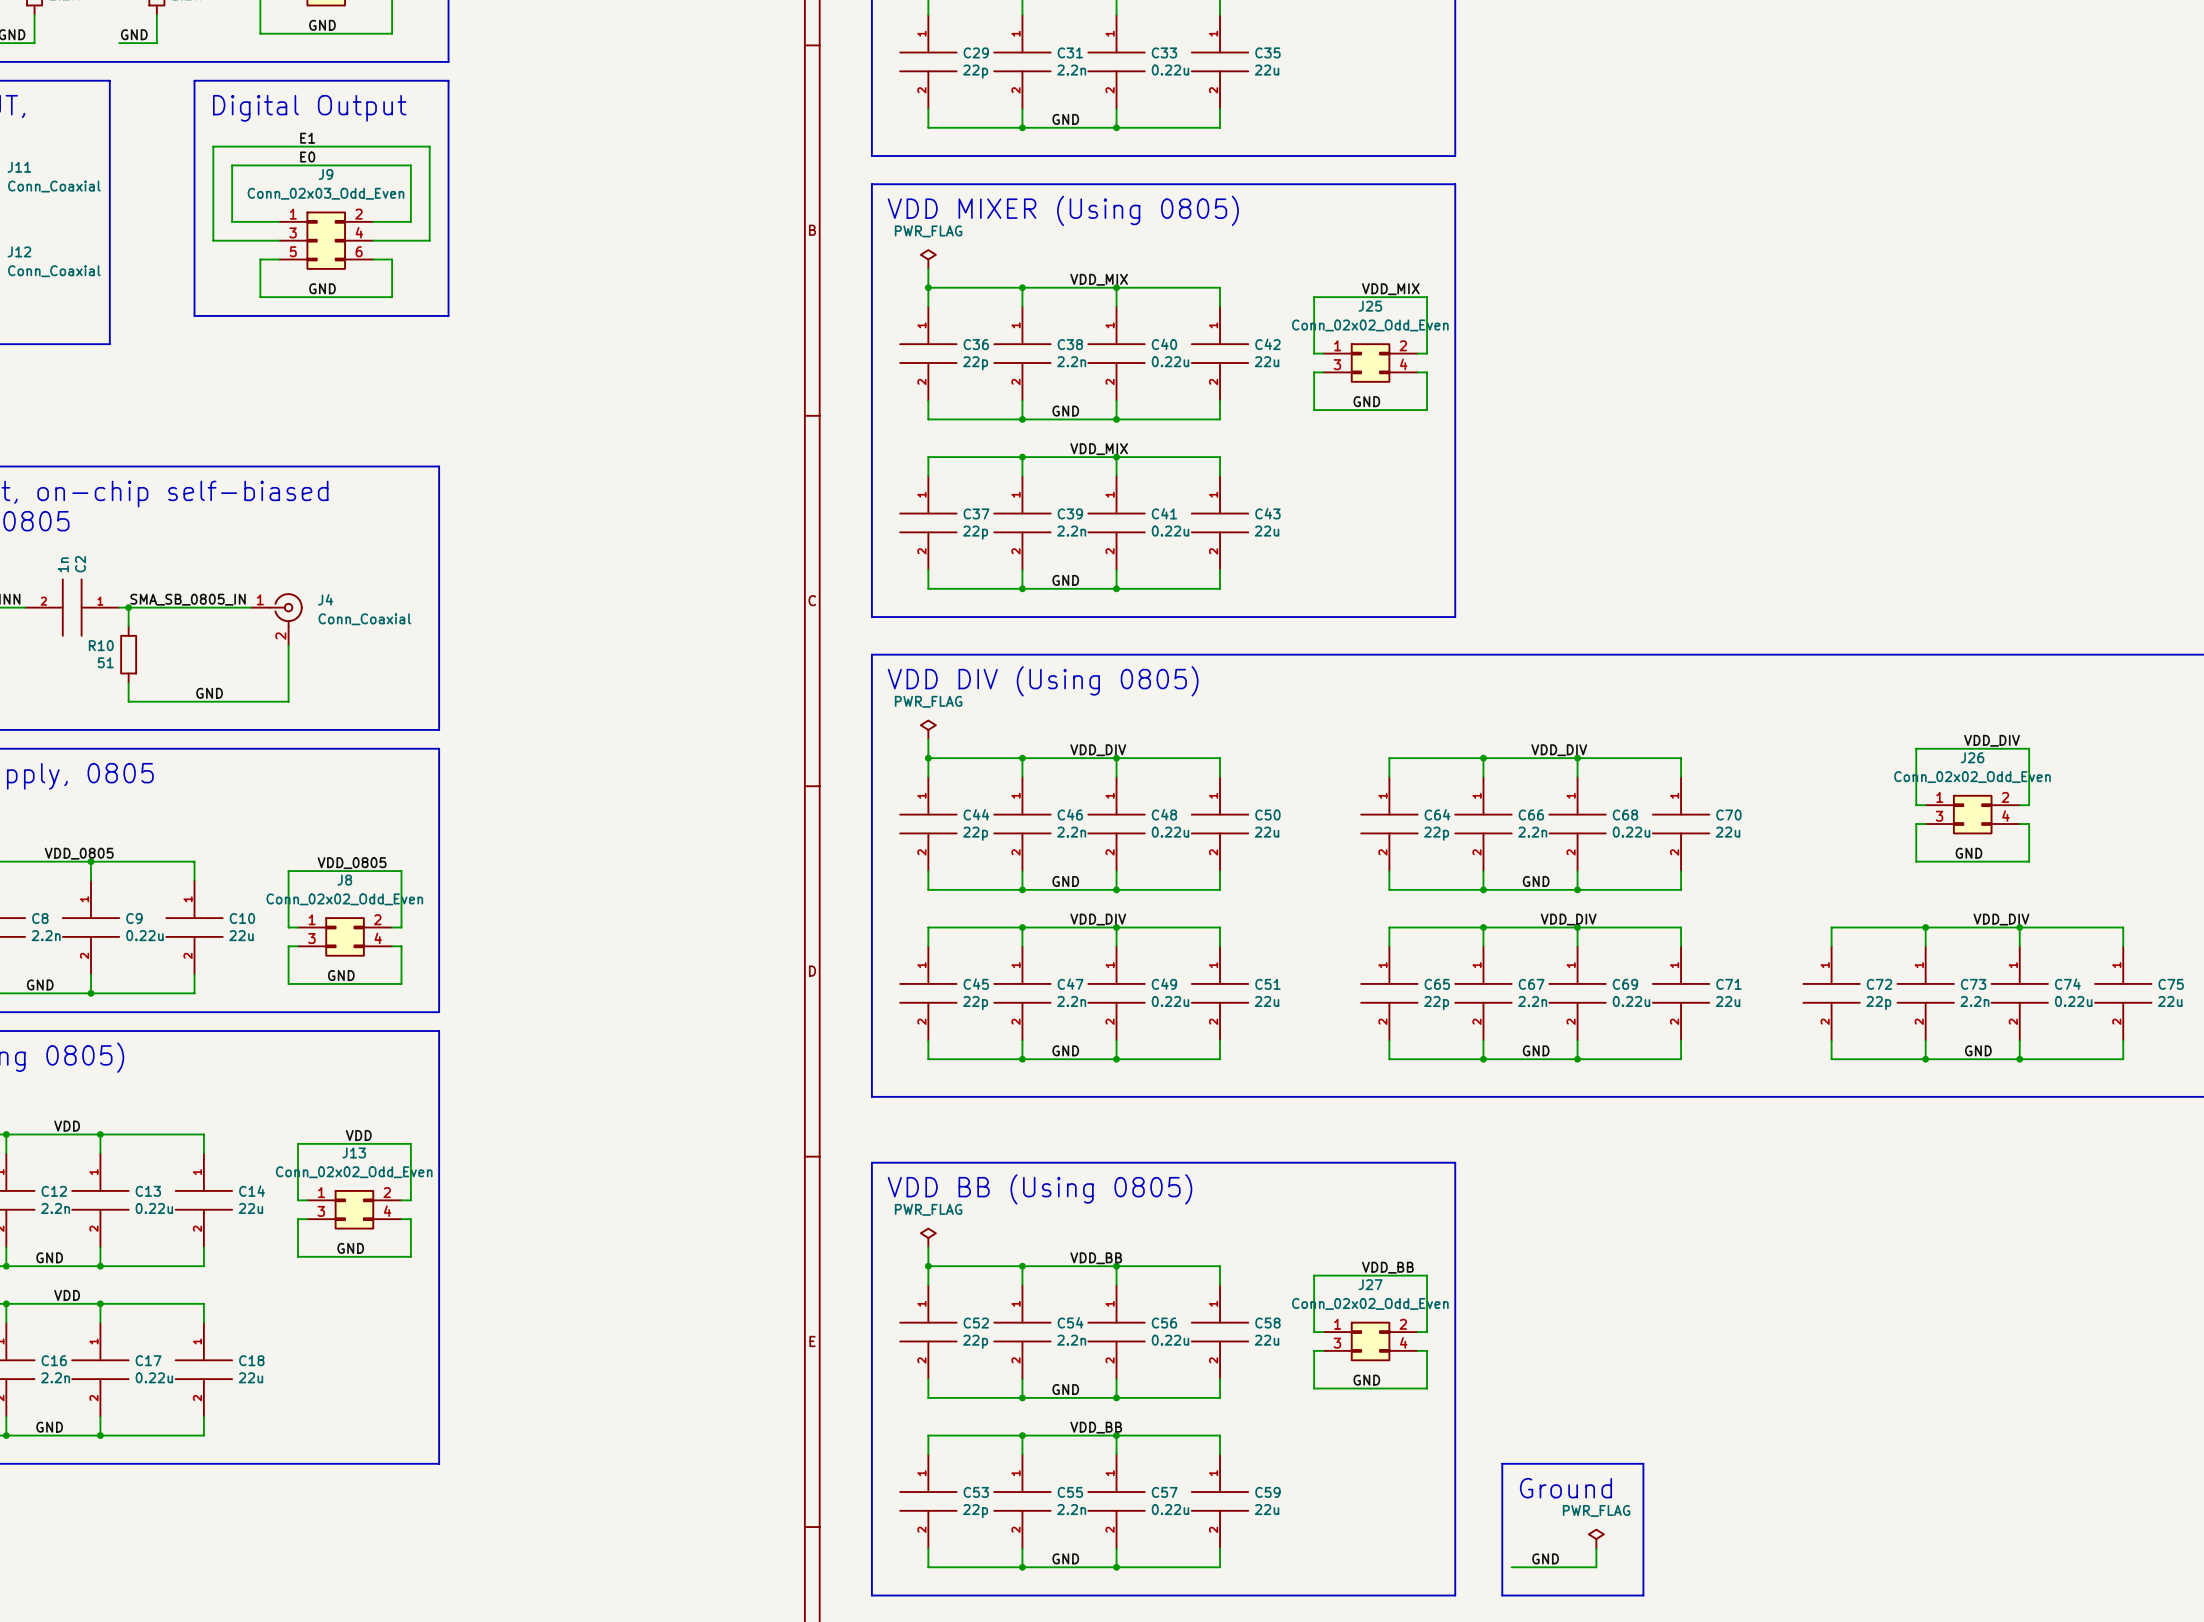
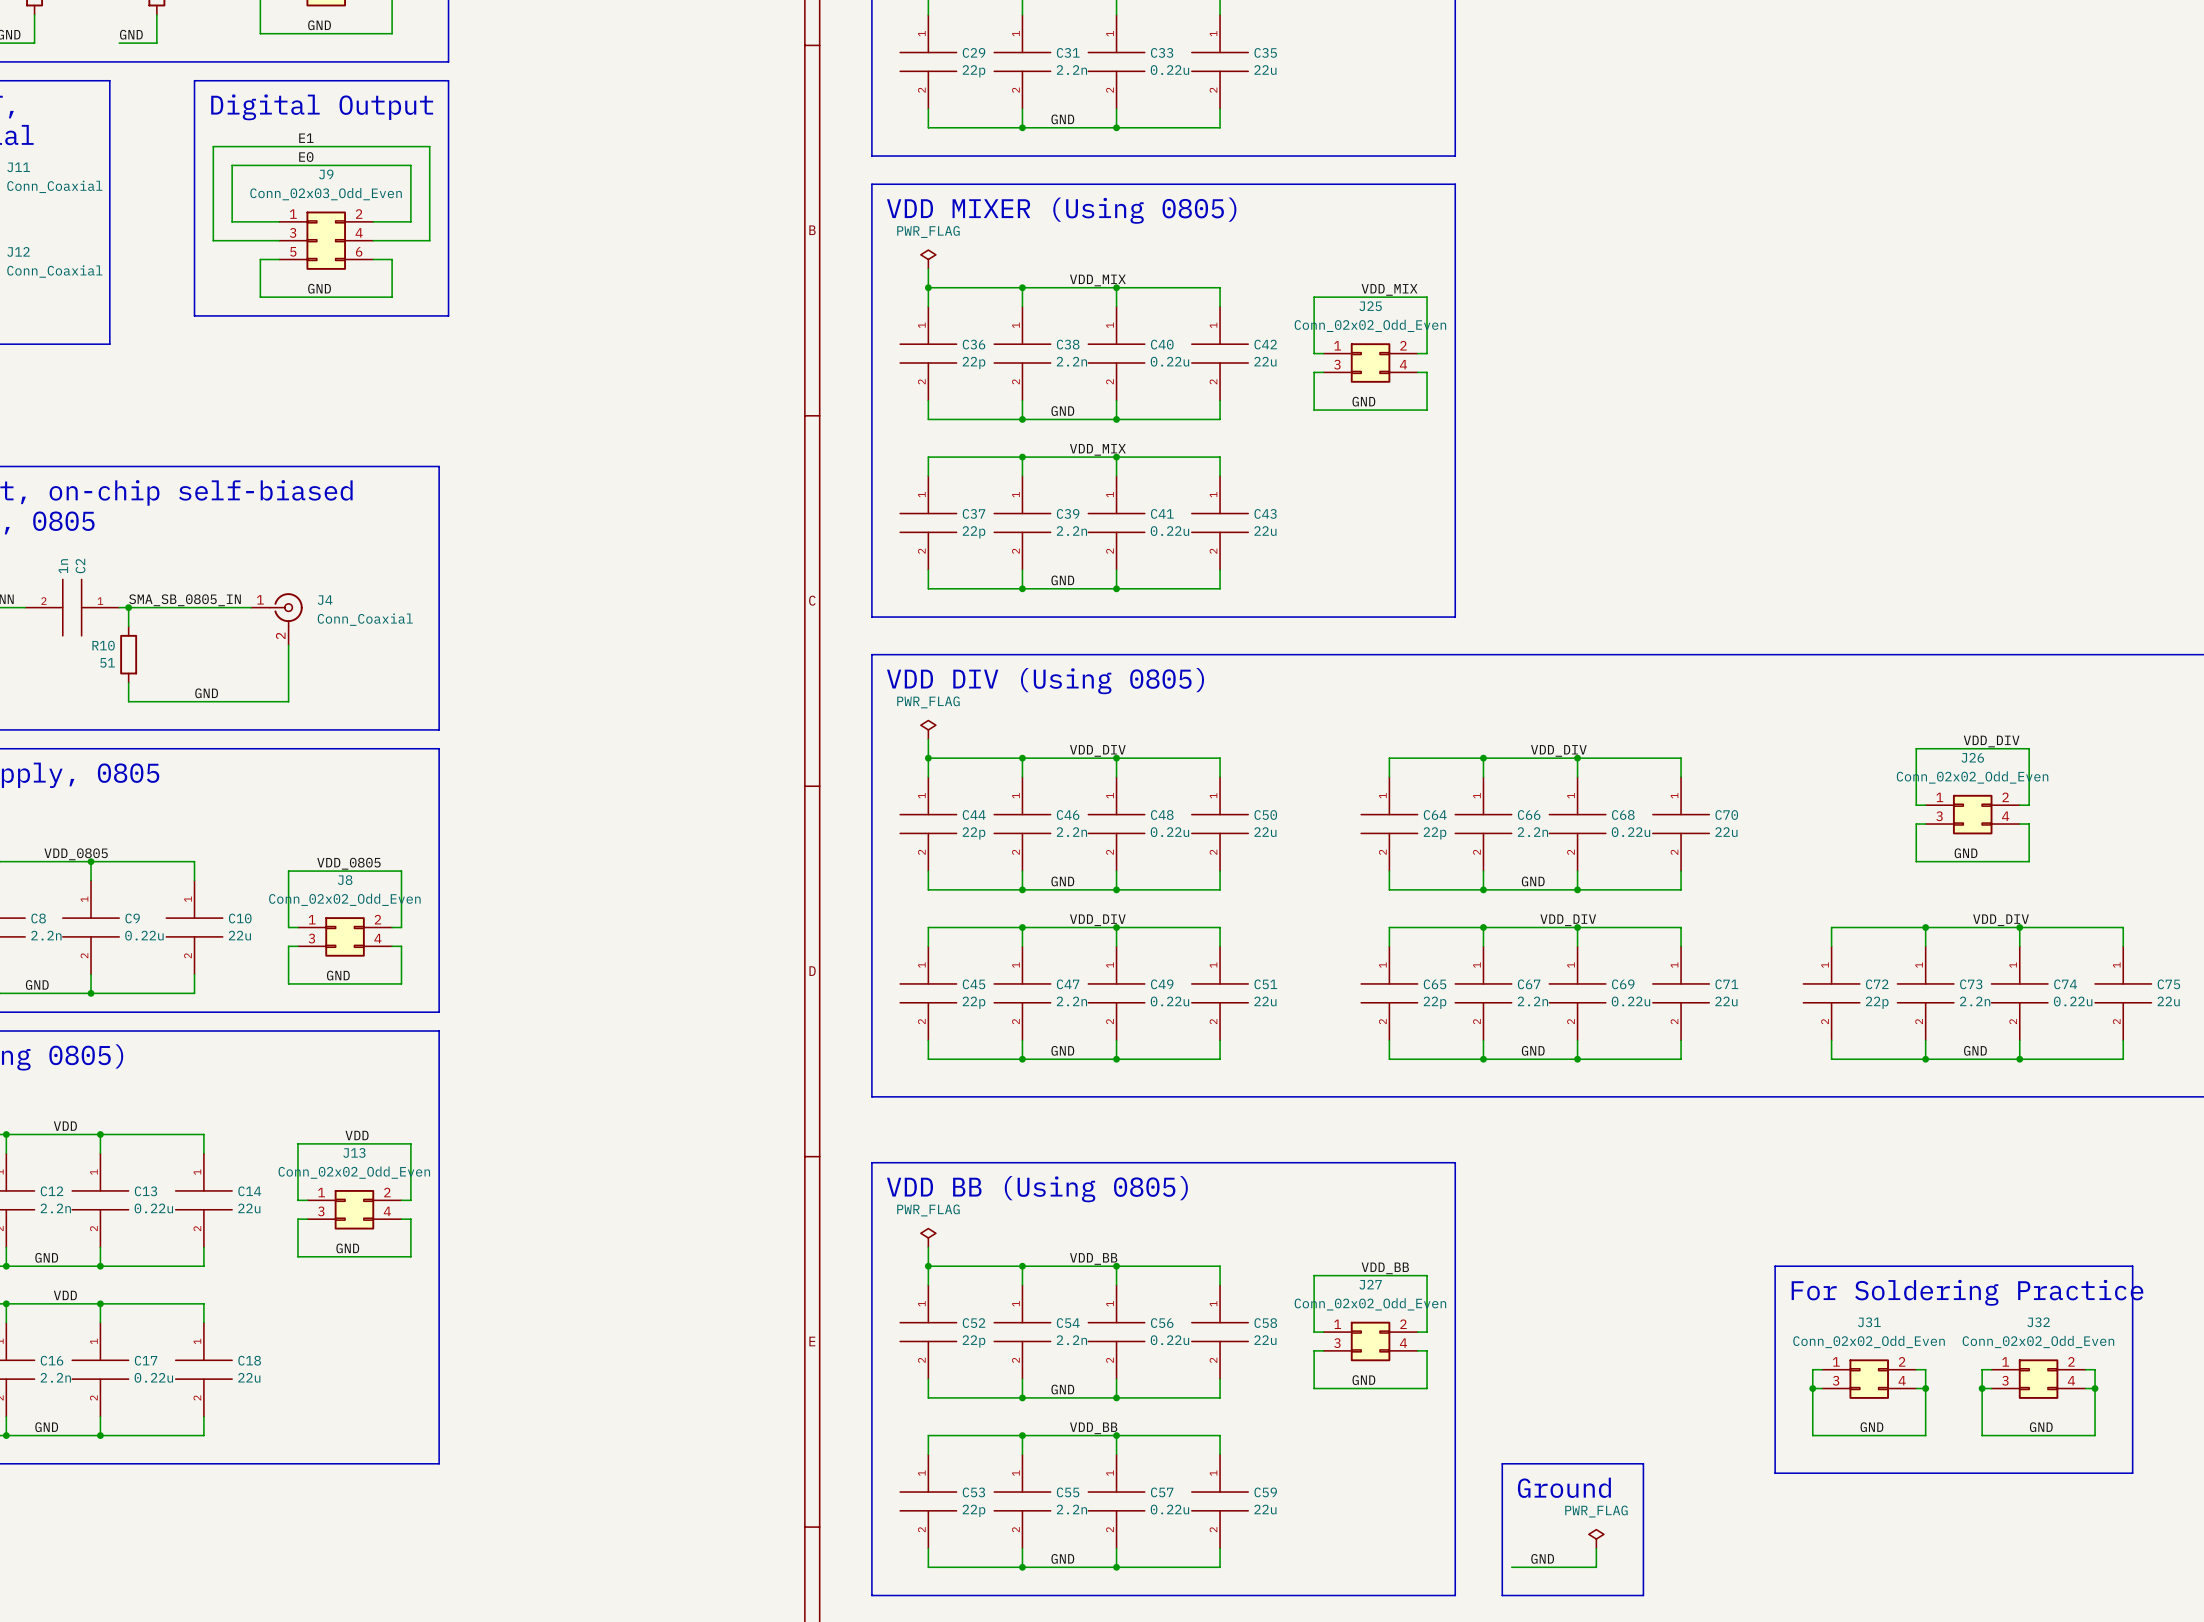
line: none -> (1775, 1266) (2132, 1266) (2132, 1473) (1775, 1473) (1775, 1266)
text: none -> For Soldering Practice (1967, 1292)
wire: none -> (1822, 1369) (1812, 1369) (1812, 1435) (1925, 1435) (1925, 1369) (1916, 1369)
wire: none -> (1991, 1369) (1982, 1369) (1982, 1435) (2095, 1435) (2095, 1369) (2085, 1369)
J31: none -> Conn_02x02_Odd_Even (1869, 1379)
J32: none -> Conn_02x02_Odd_Even (2038, 1379)
wire: none -> (1812, 1388) (1822, 1388)
junction: none -> (1812, 1388)
wire: none -> (1916, 1388) (1925, 1388)
junction: none -> (1925, 1388)
wire: none -> (1982, 1388) (1991, 1388)
junction: none -> (1982, 1388)
wire: none -> (2085, 1388) (2095, 1388)
junction: none -> (2095, 1388)
label: none -> GND (1871, 1427)
label: none -> GND (2041, 1427)

